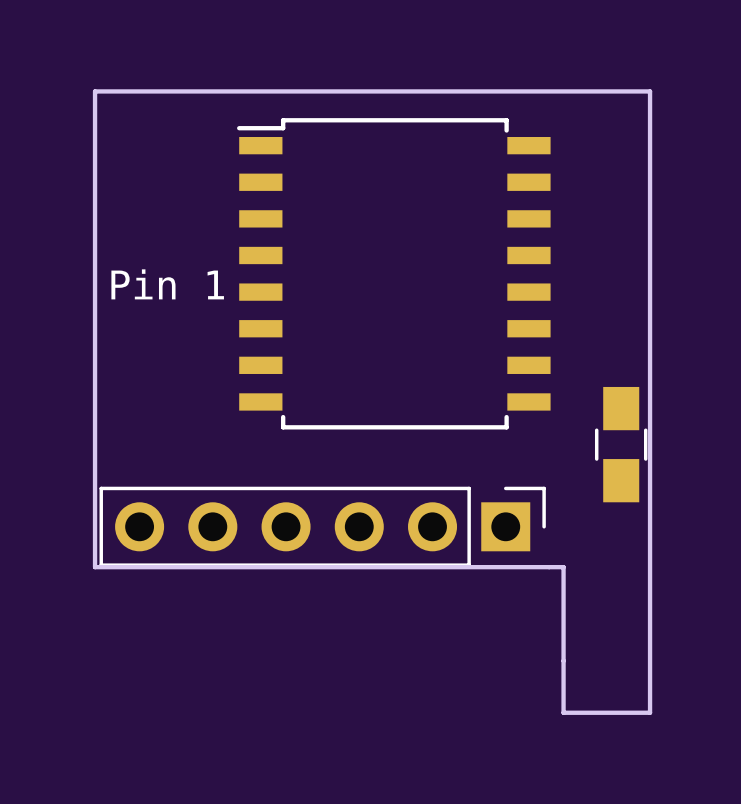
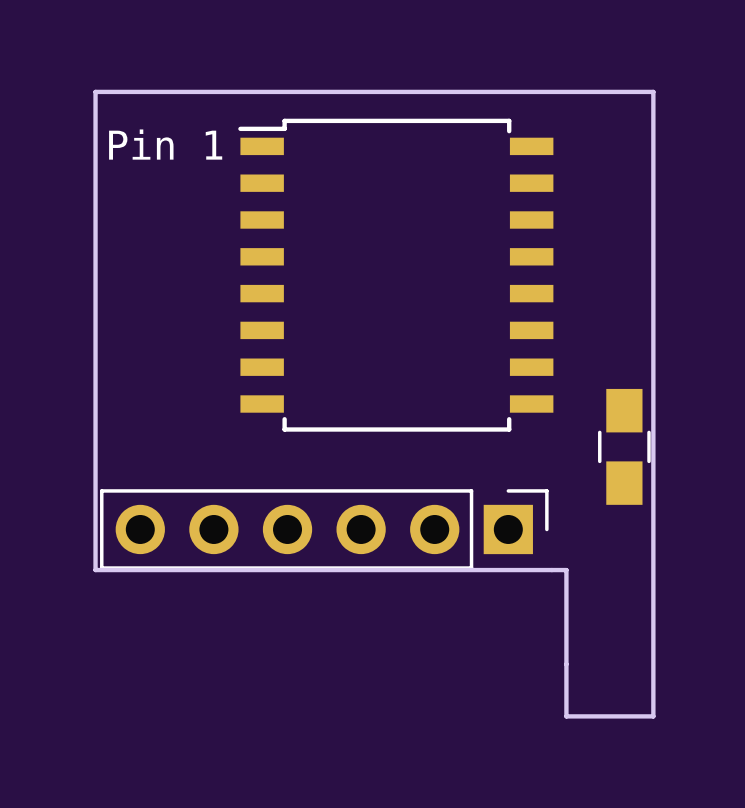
text position: Pin 1 (167, 284) -> Pin 1 (165, 144)

